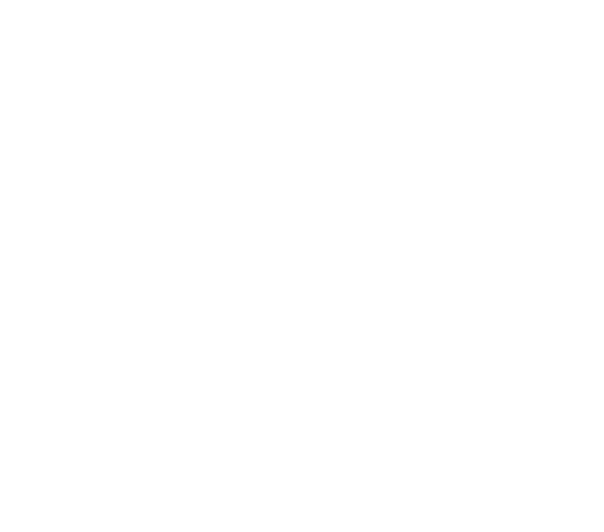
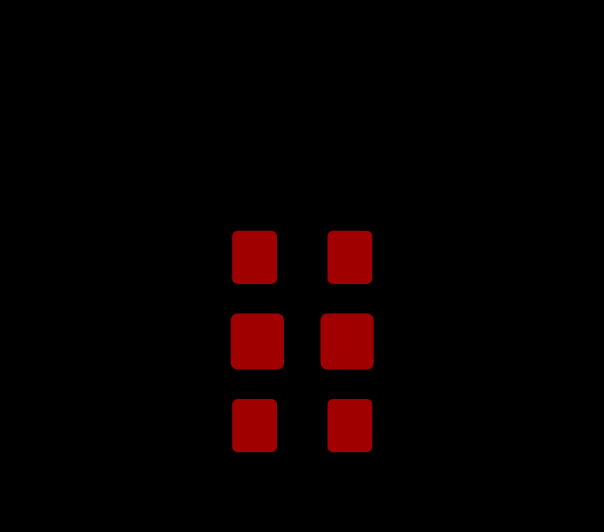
part: none -> (302, 257)
part: none -> (302, 341)
part: none -> (302, 425)

